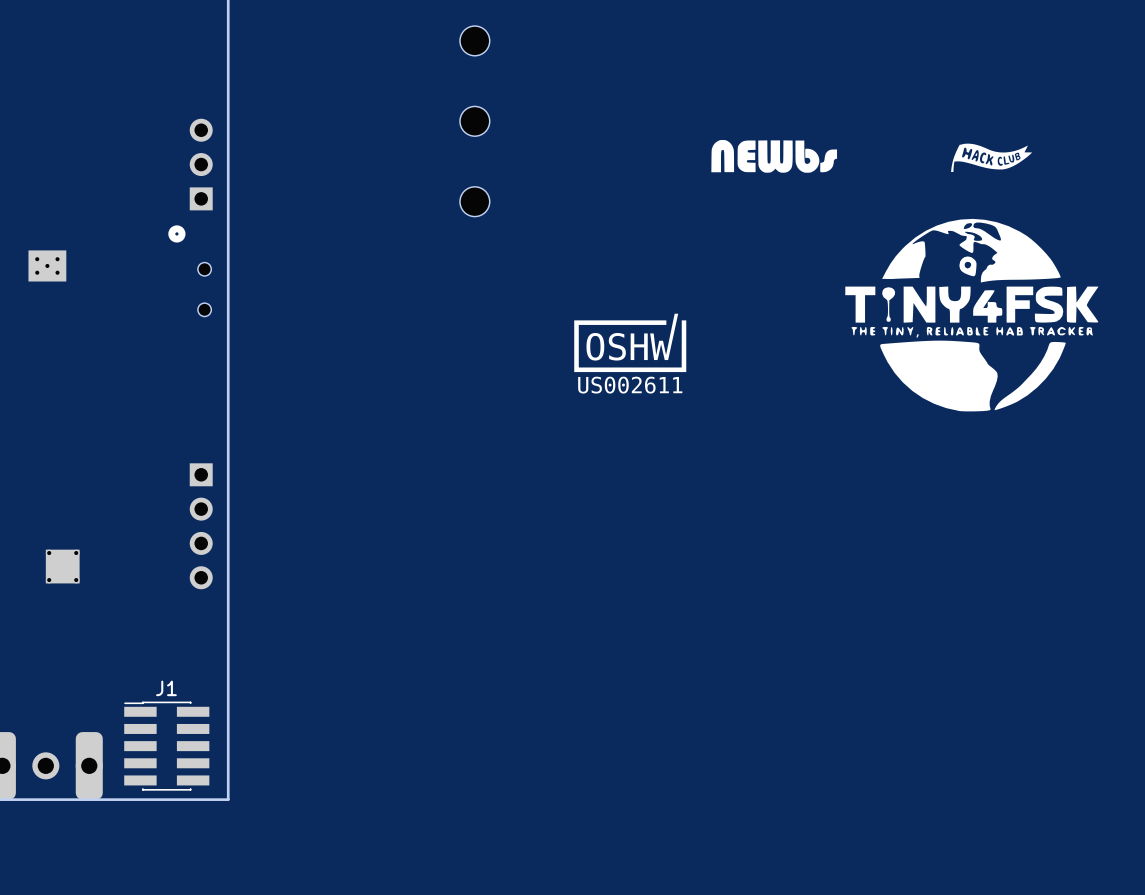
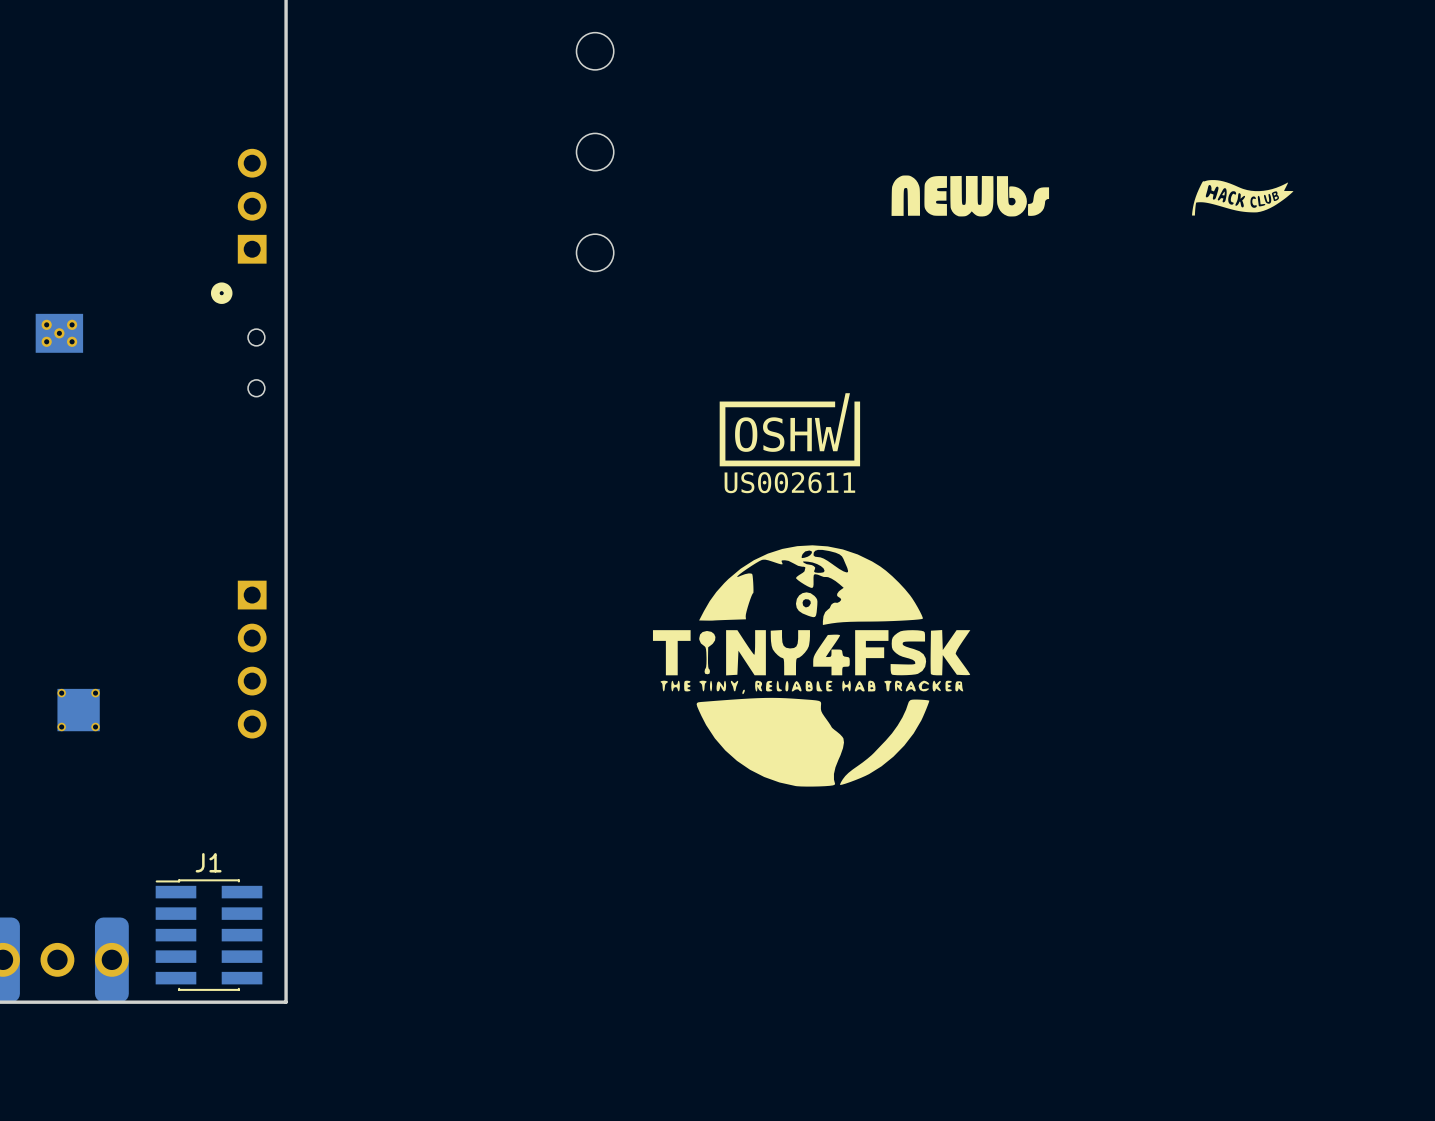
drawing: [845, 218, 1099, 412] -> none
drawing: none -> [652, 545, 971, 787]

